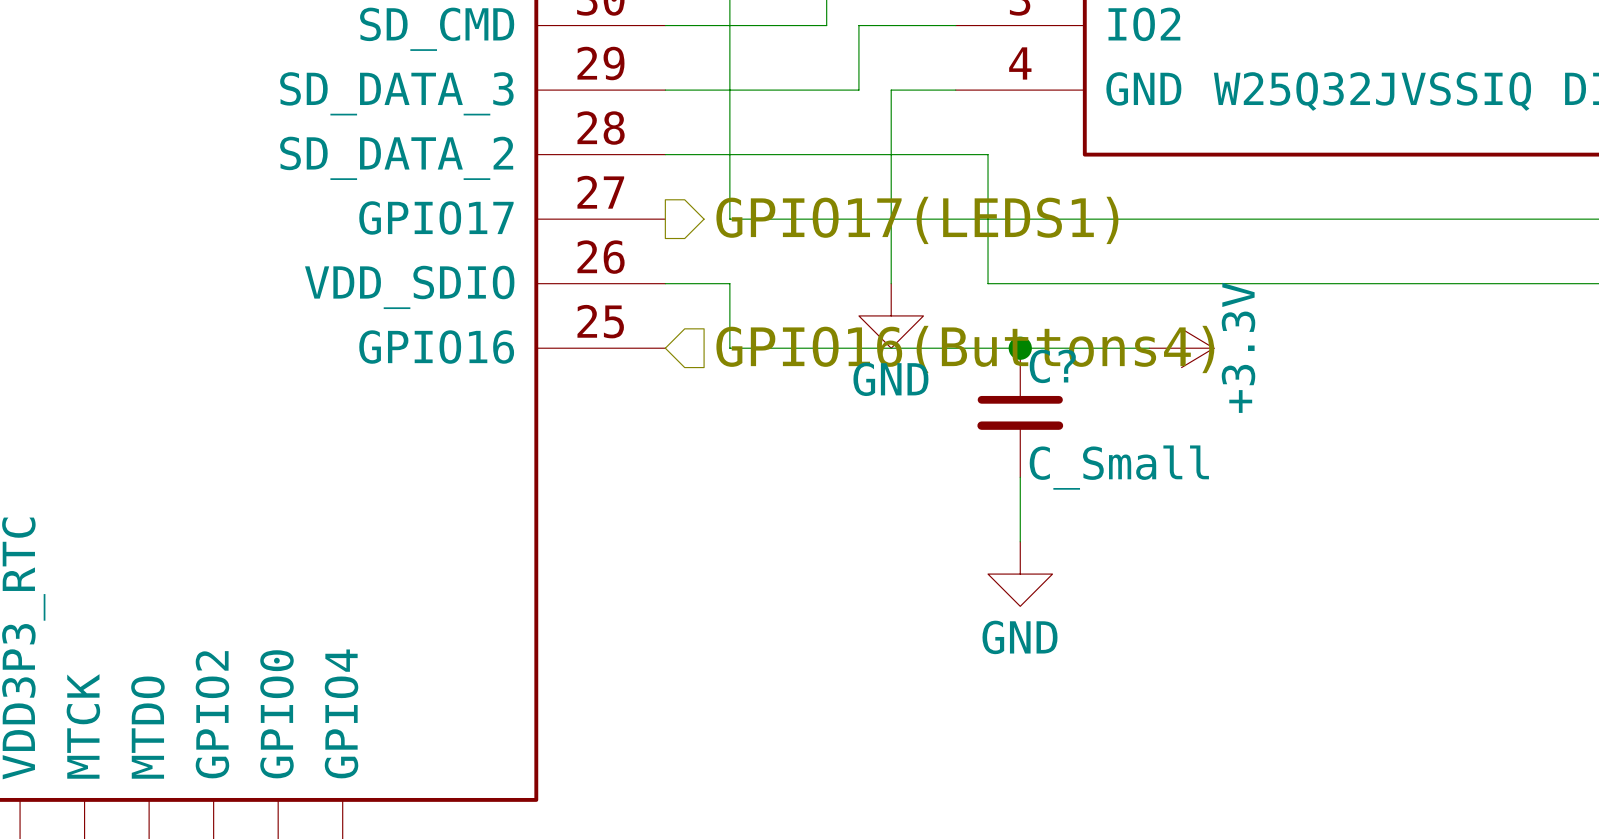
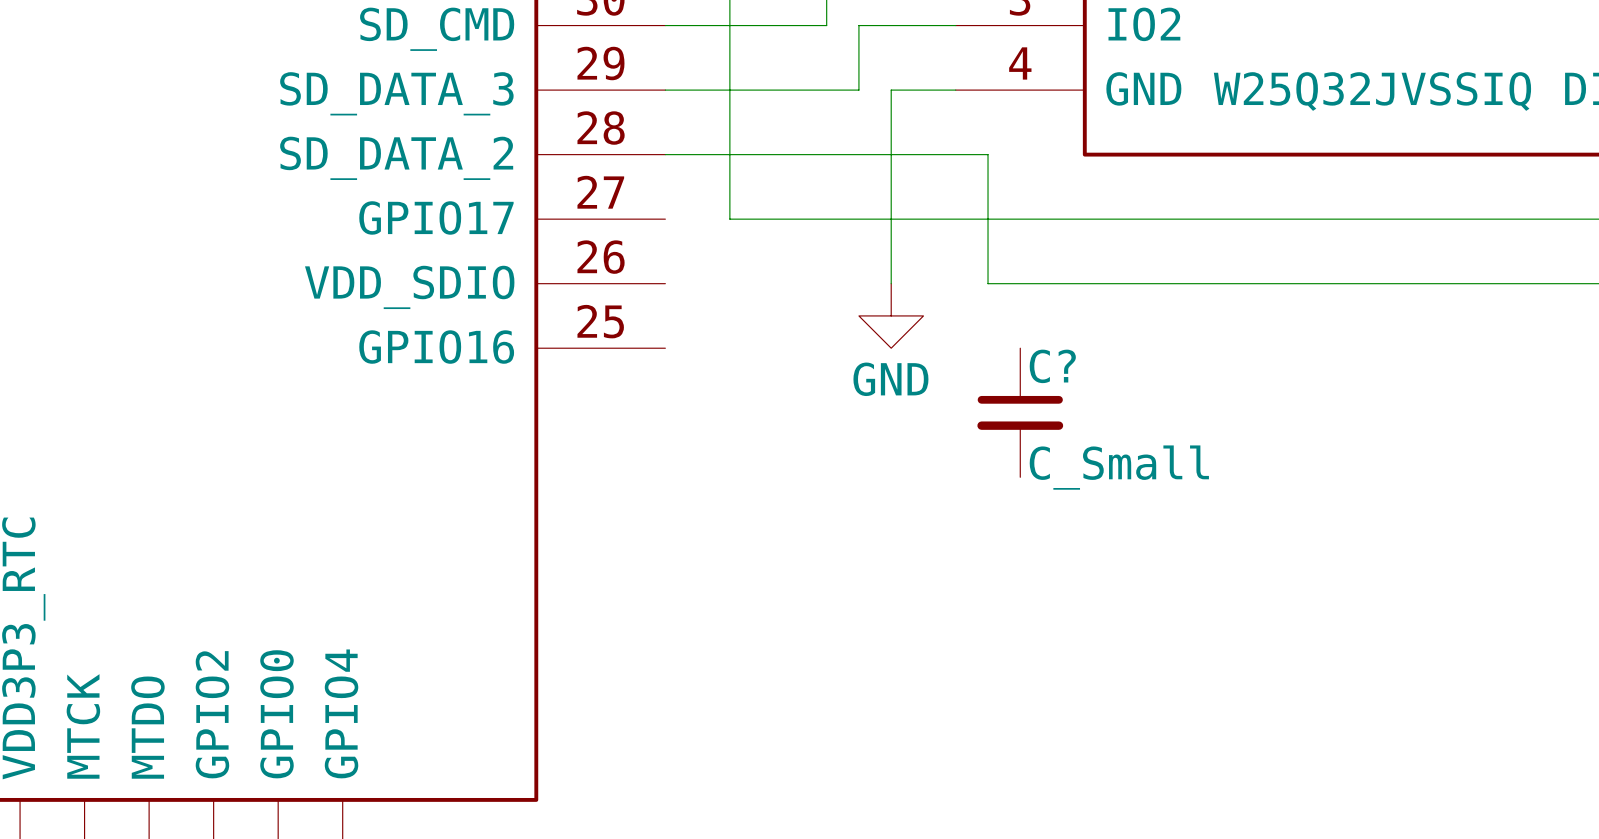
hierarchical label: GPIO17(LEDS1) (917, 220) -> none
wire: (665, 283) (729, 283) (729, 348) (1149, 348) -> none
junction: (1020, 348) -> none
power symbol: +3.3V (1181, 348) -> none
hierarchical label: GPIO16(Buttons4) (965, 349) -> none
wire: (1020, 477) (1020, 541) -> none
power symbol: GND (1020, 574) -> none

